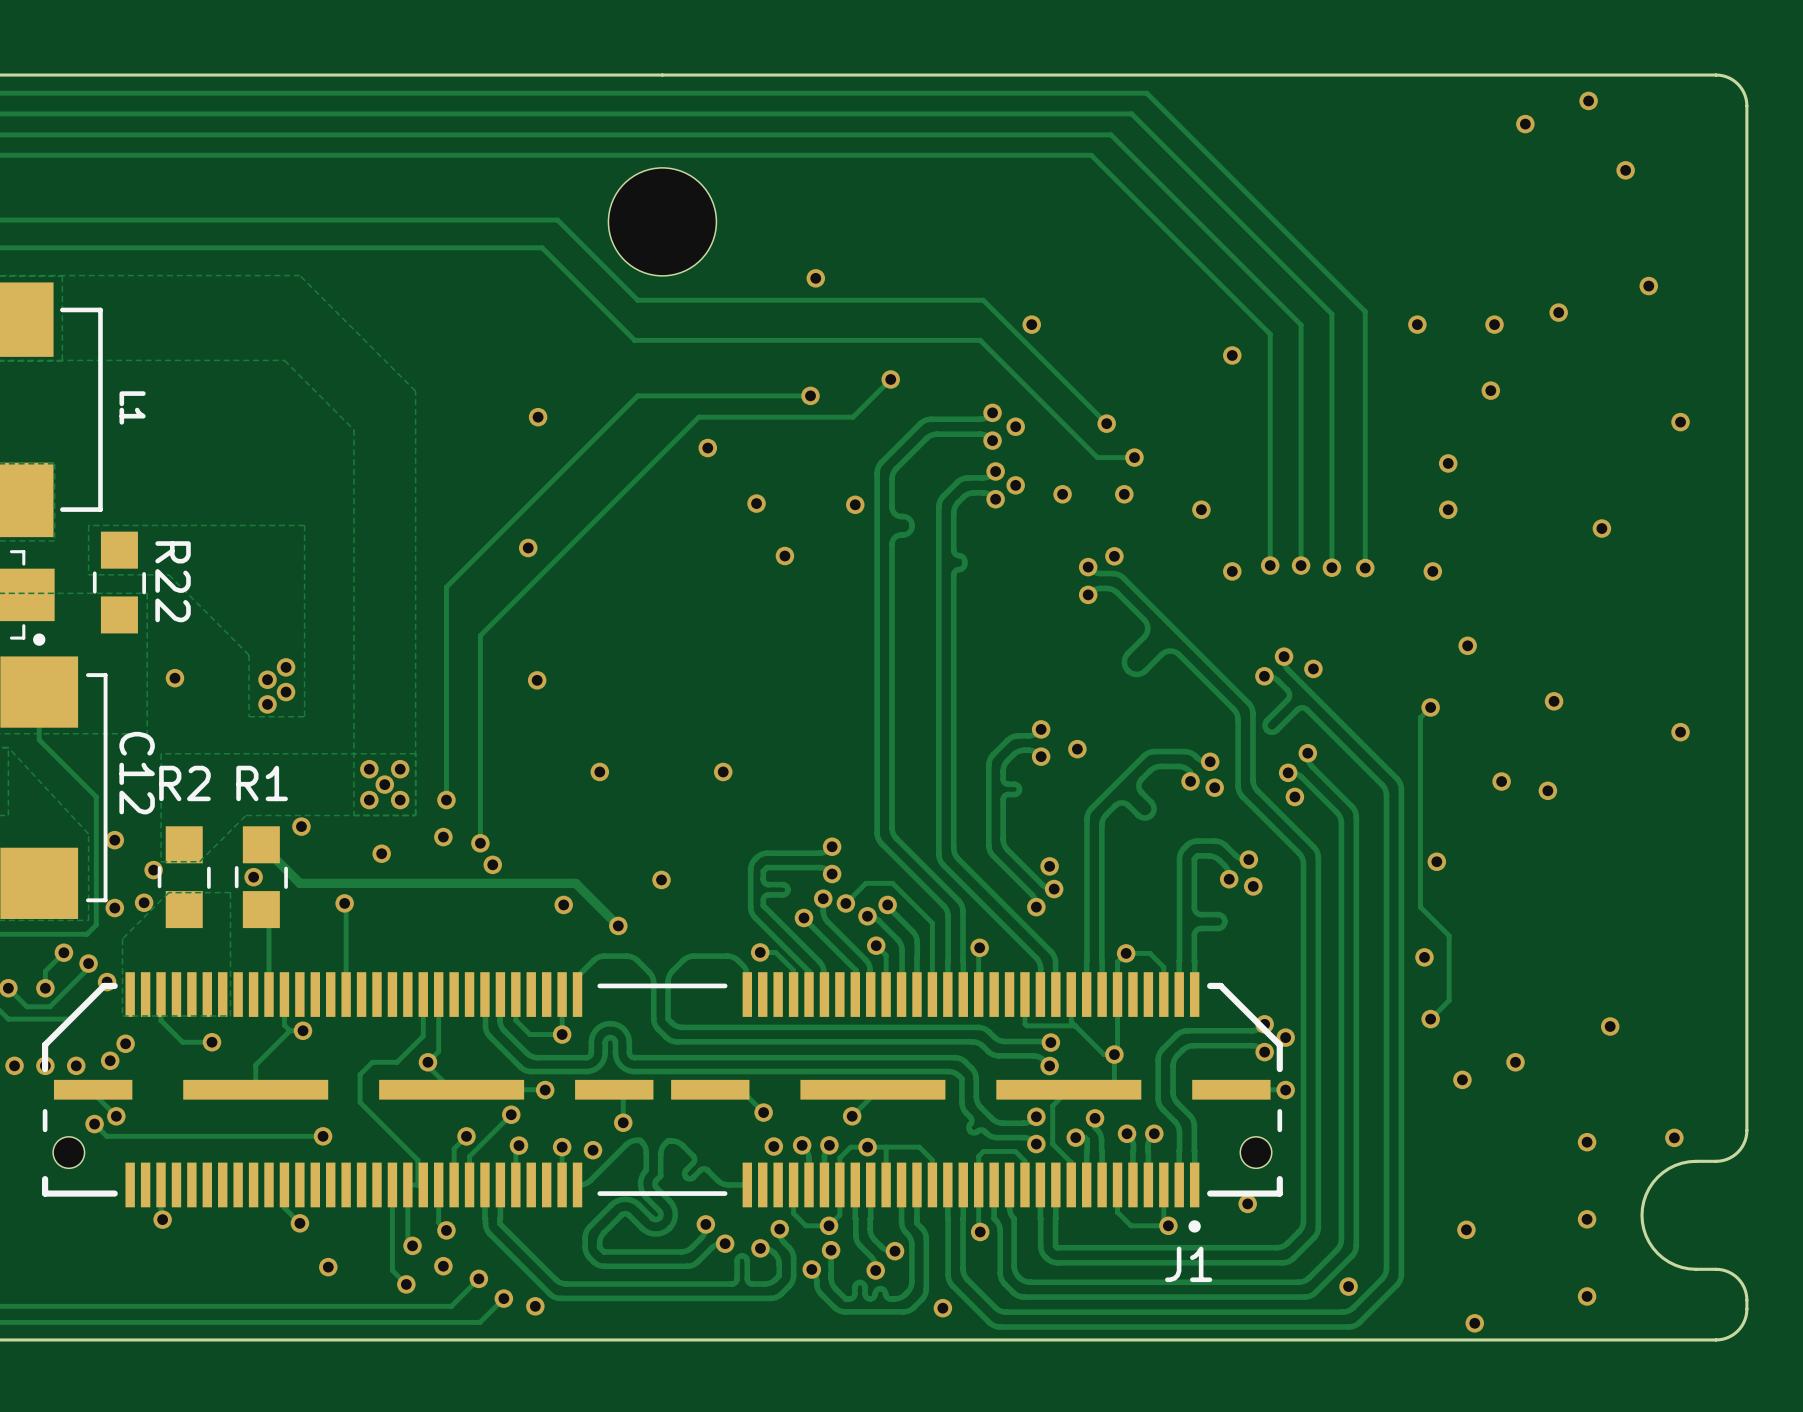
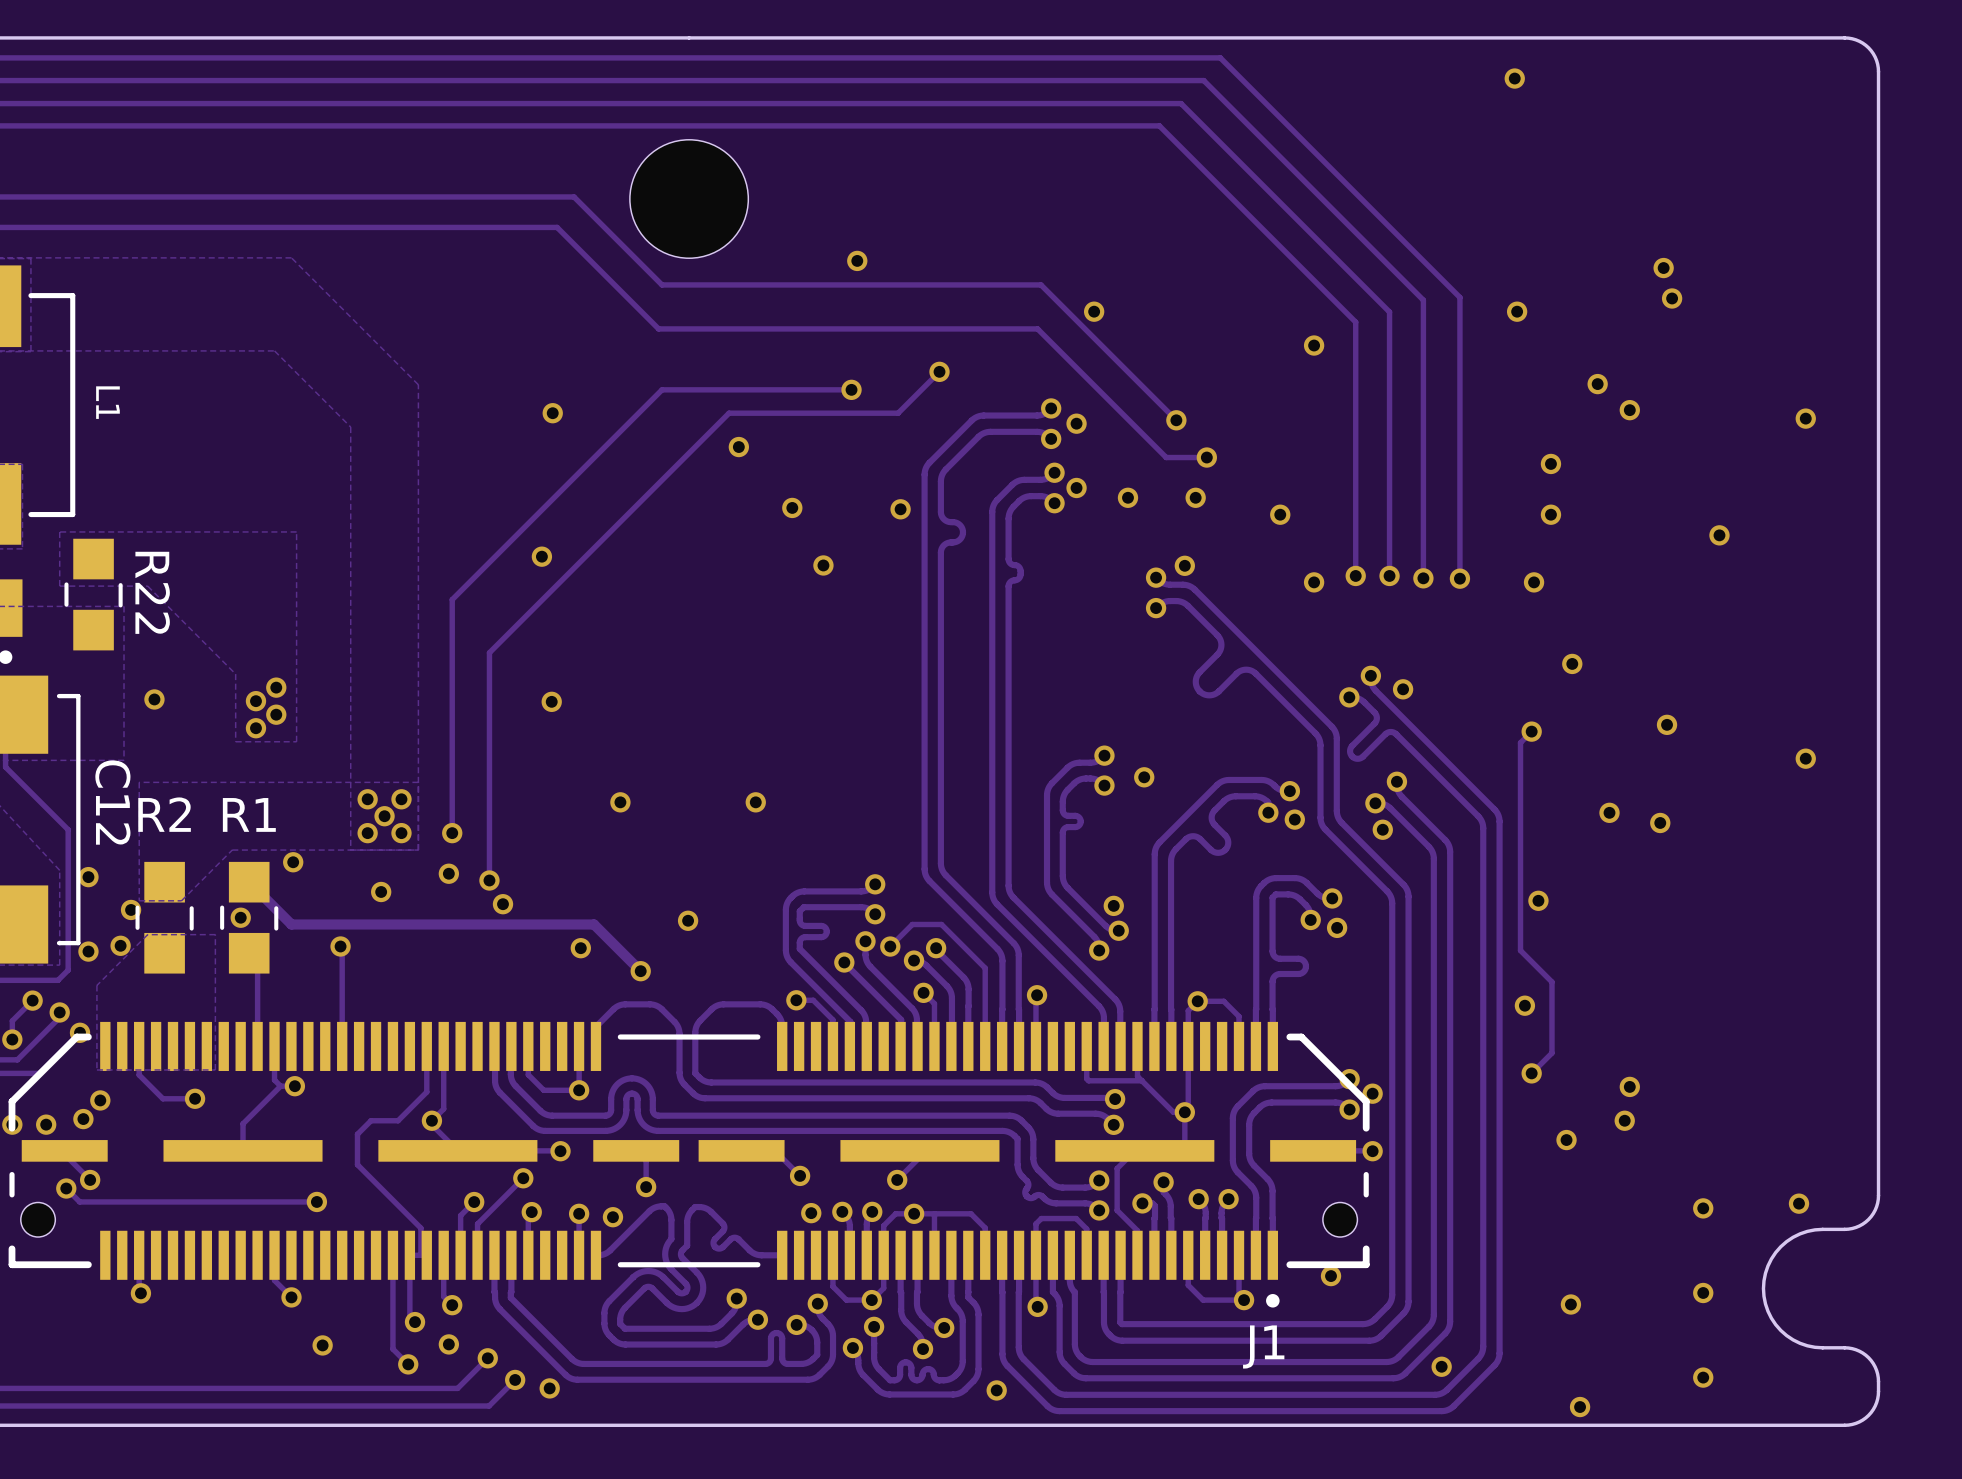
via: (1588, 100) -> none
via: none -> (1514, 78)
via: (1525, 124) -> none
via: (1625, 170) -> none
via: none -> (1663, 268)
via: (1648, 286) -> none
via: (1494, 324) -> none
via: none -> (1629, 410)
via position: (1610, 1026) -> (1629, 1086)

